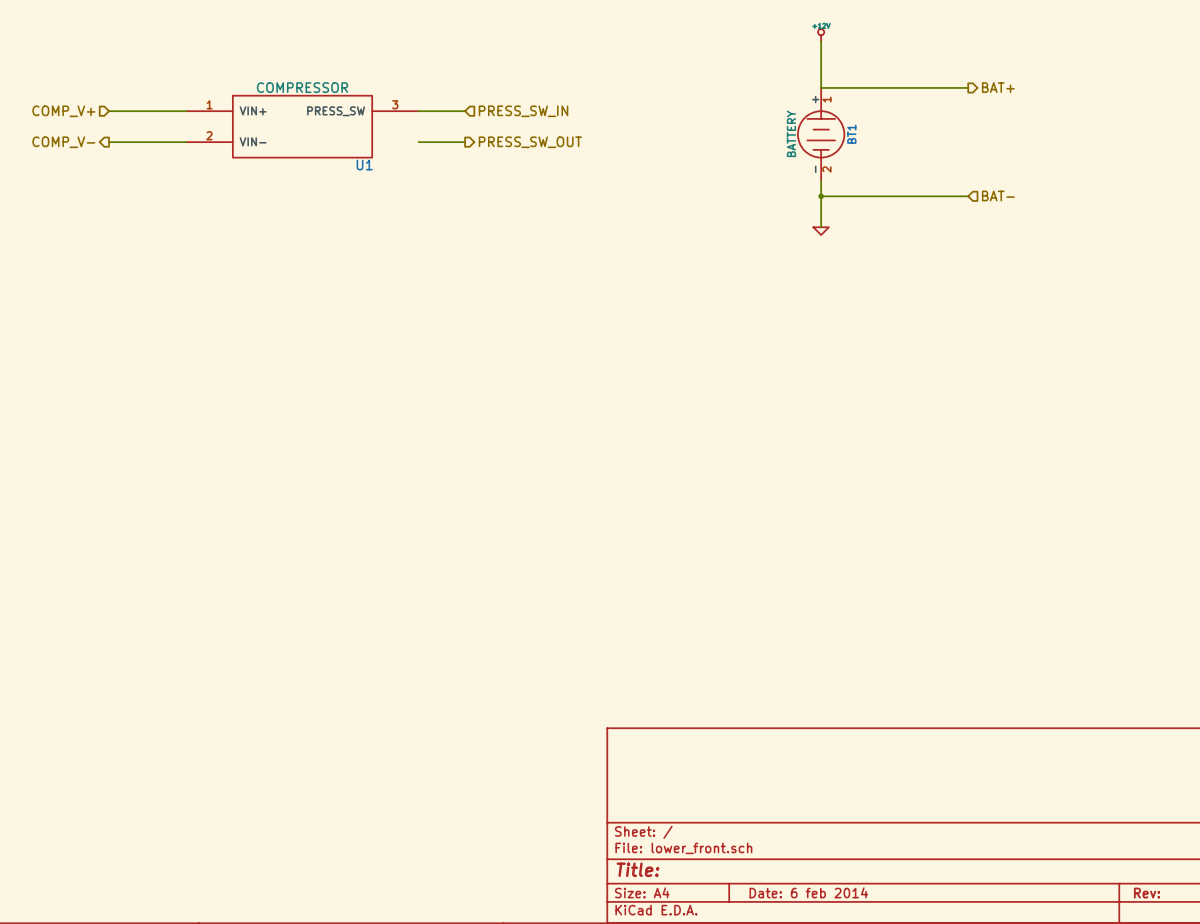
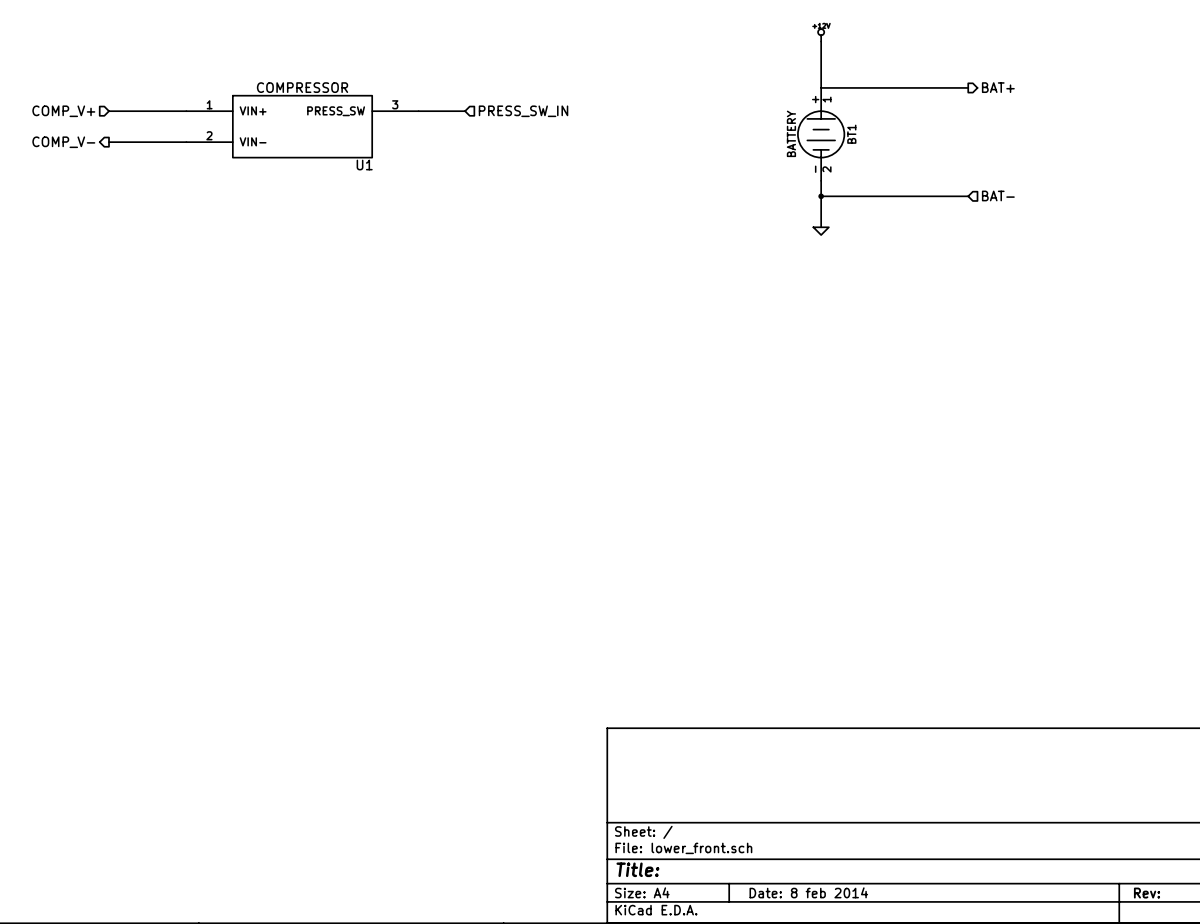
wire: (418, 142) (465, 142) -> none
hierarchical label: PRESS_SW_OUT (530, 142) -> none
title block: Date: 6 feb 2014 (808, 892) -> Date: 8 feb 2014 (808, 892)

